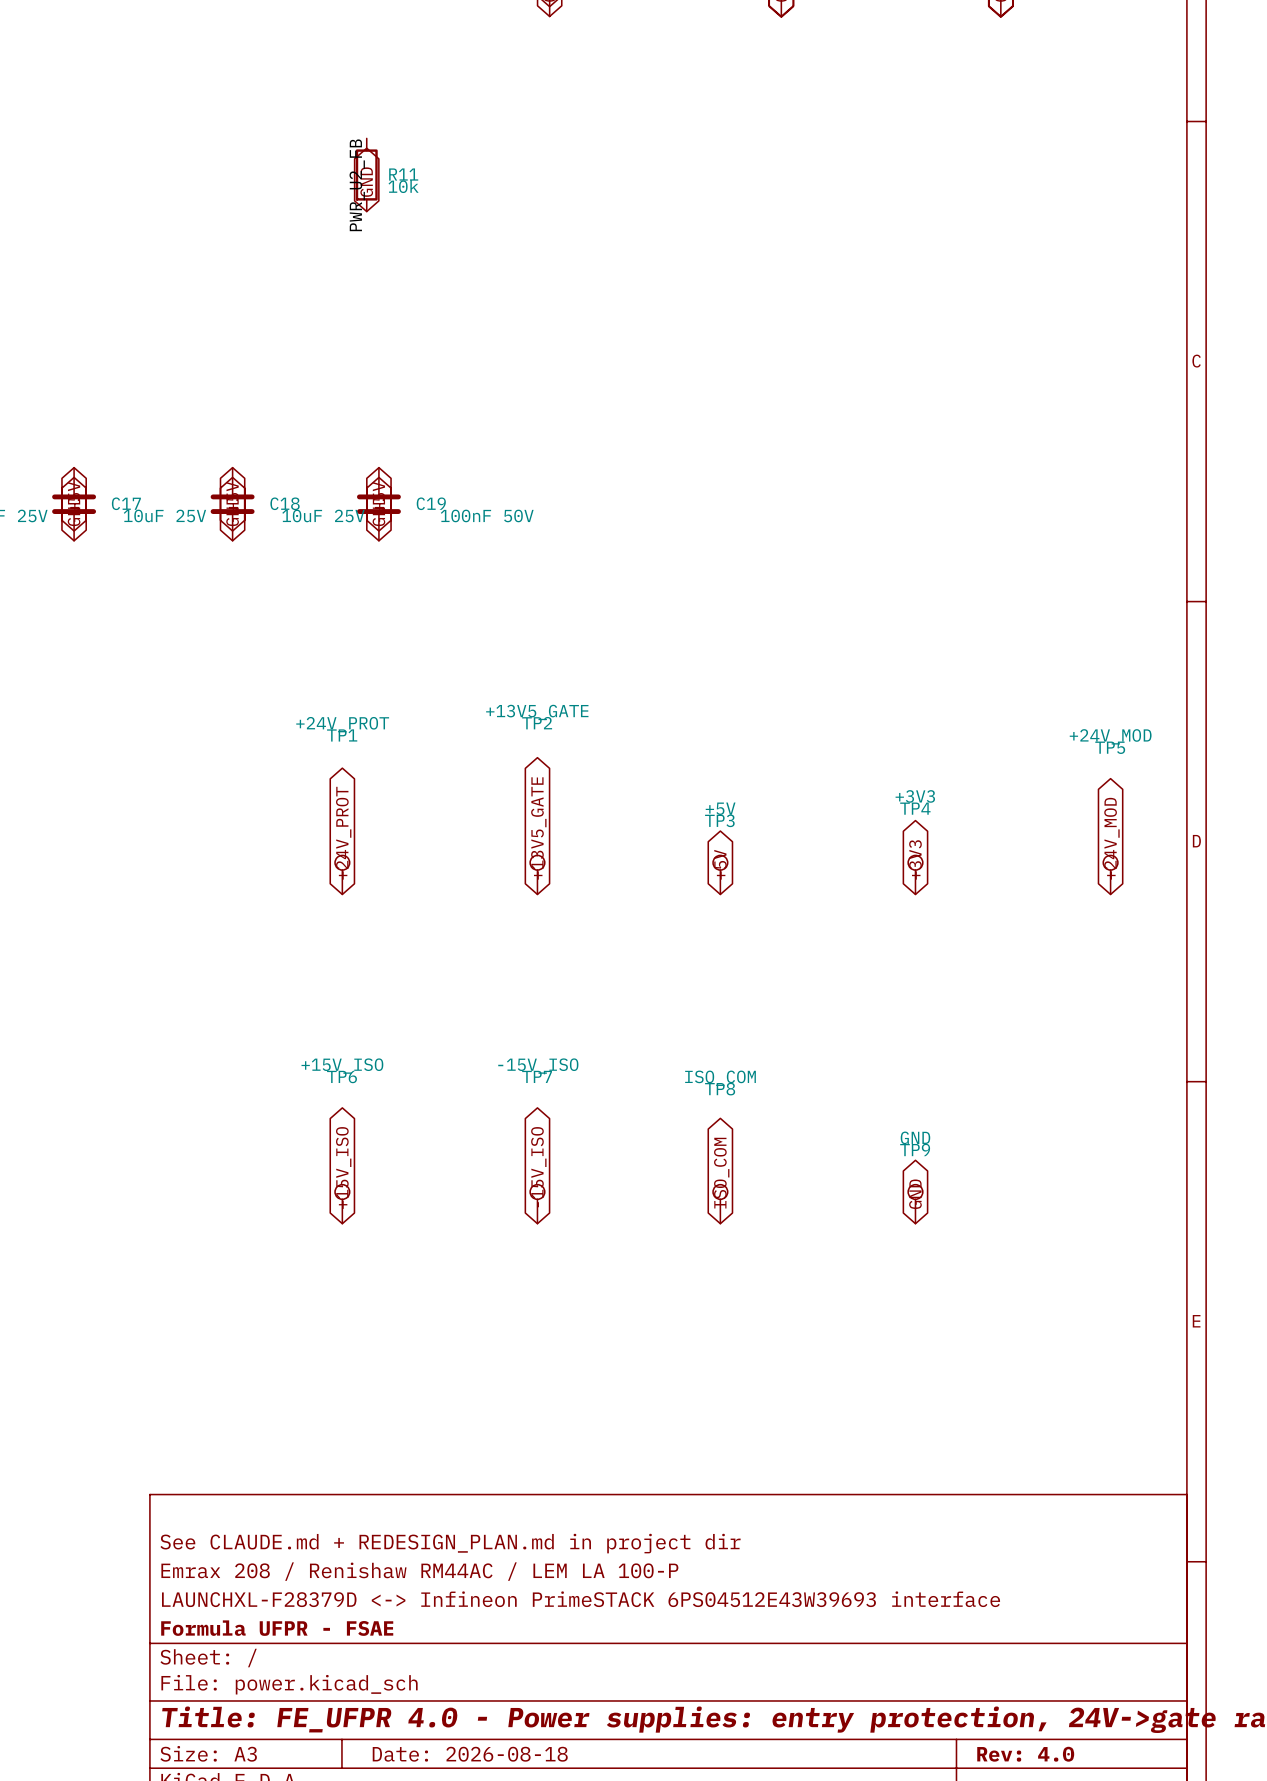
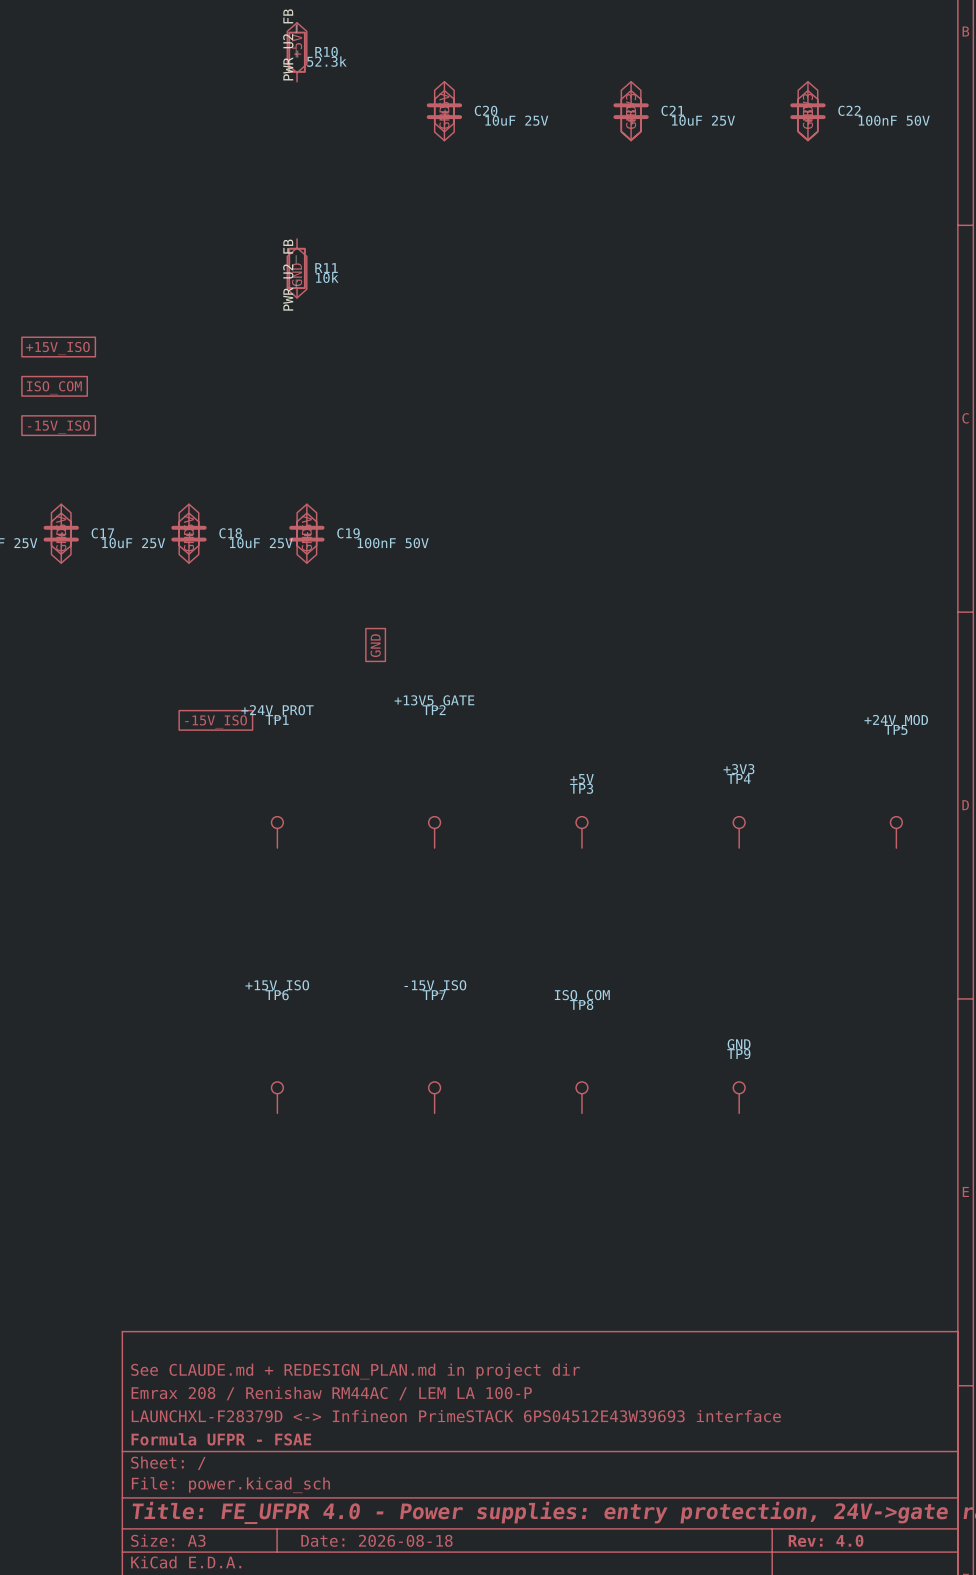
global label: none -> +15V_ISO (57, 348)
global label: none -> ISO_COM (54, 387)
global label: none -> -15V_ISO (58, 427)
global label: none -> GND (375, 645)
global label: none -> -15V_ISO (216, 721)
global label: +13V5_GATE (538, 828) -> none
global label: +24V_PROT (343, 833) -> none
global label: +24V_MOD (1111, 838) -> none
global label: +3V3 (915, 859) -> none
global label: +5V (720, 864) -> none
global label: +15V_ISO (343, 1167) -> none
global label: -15V_ISO (538, 1167) -> none
global label: ISO_COM (721, 1173) -> none
global label: GND (915, 1194) -> none

